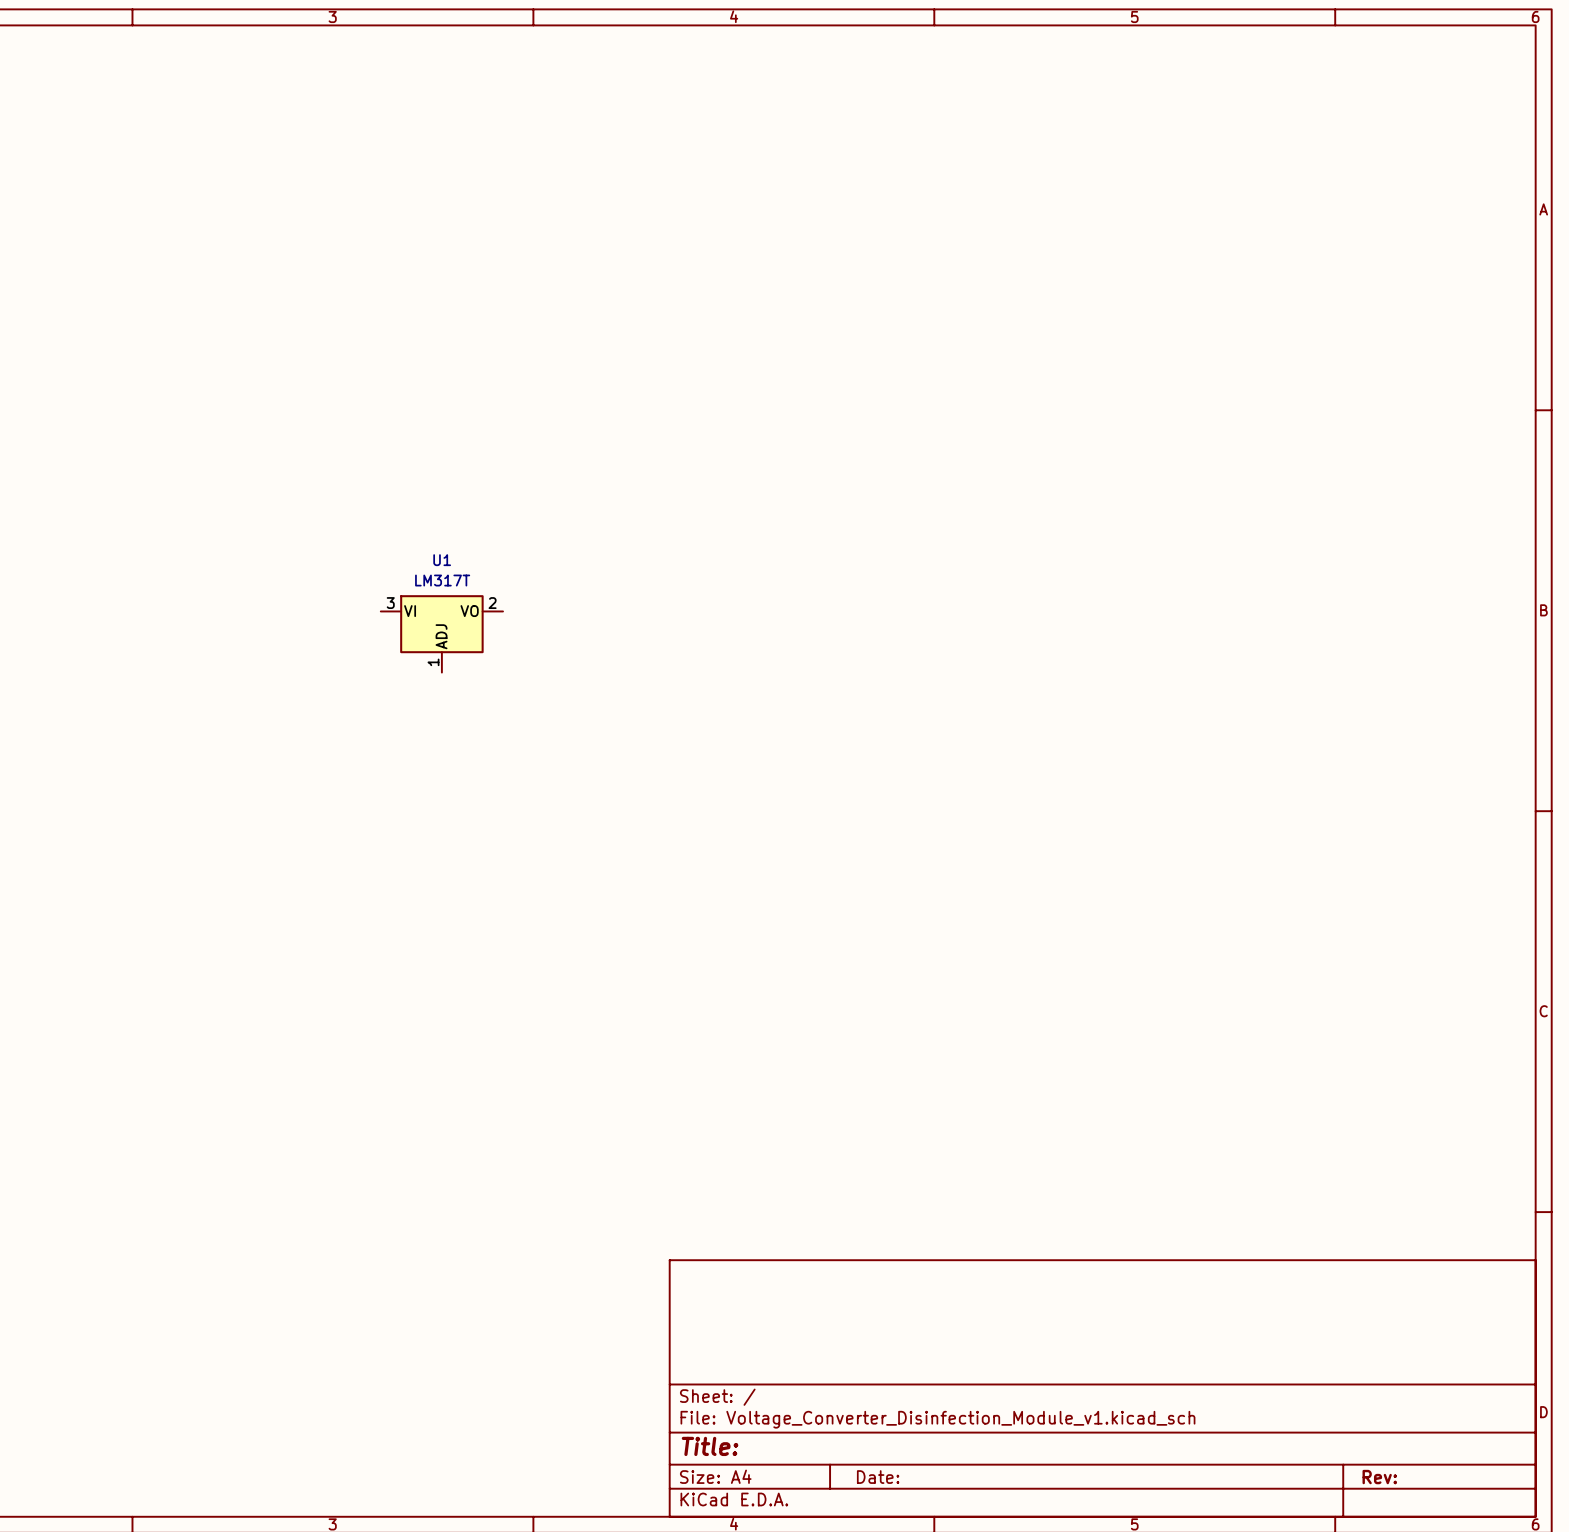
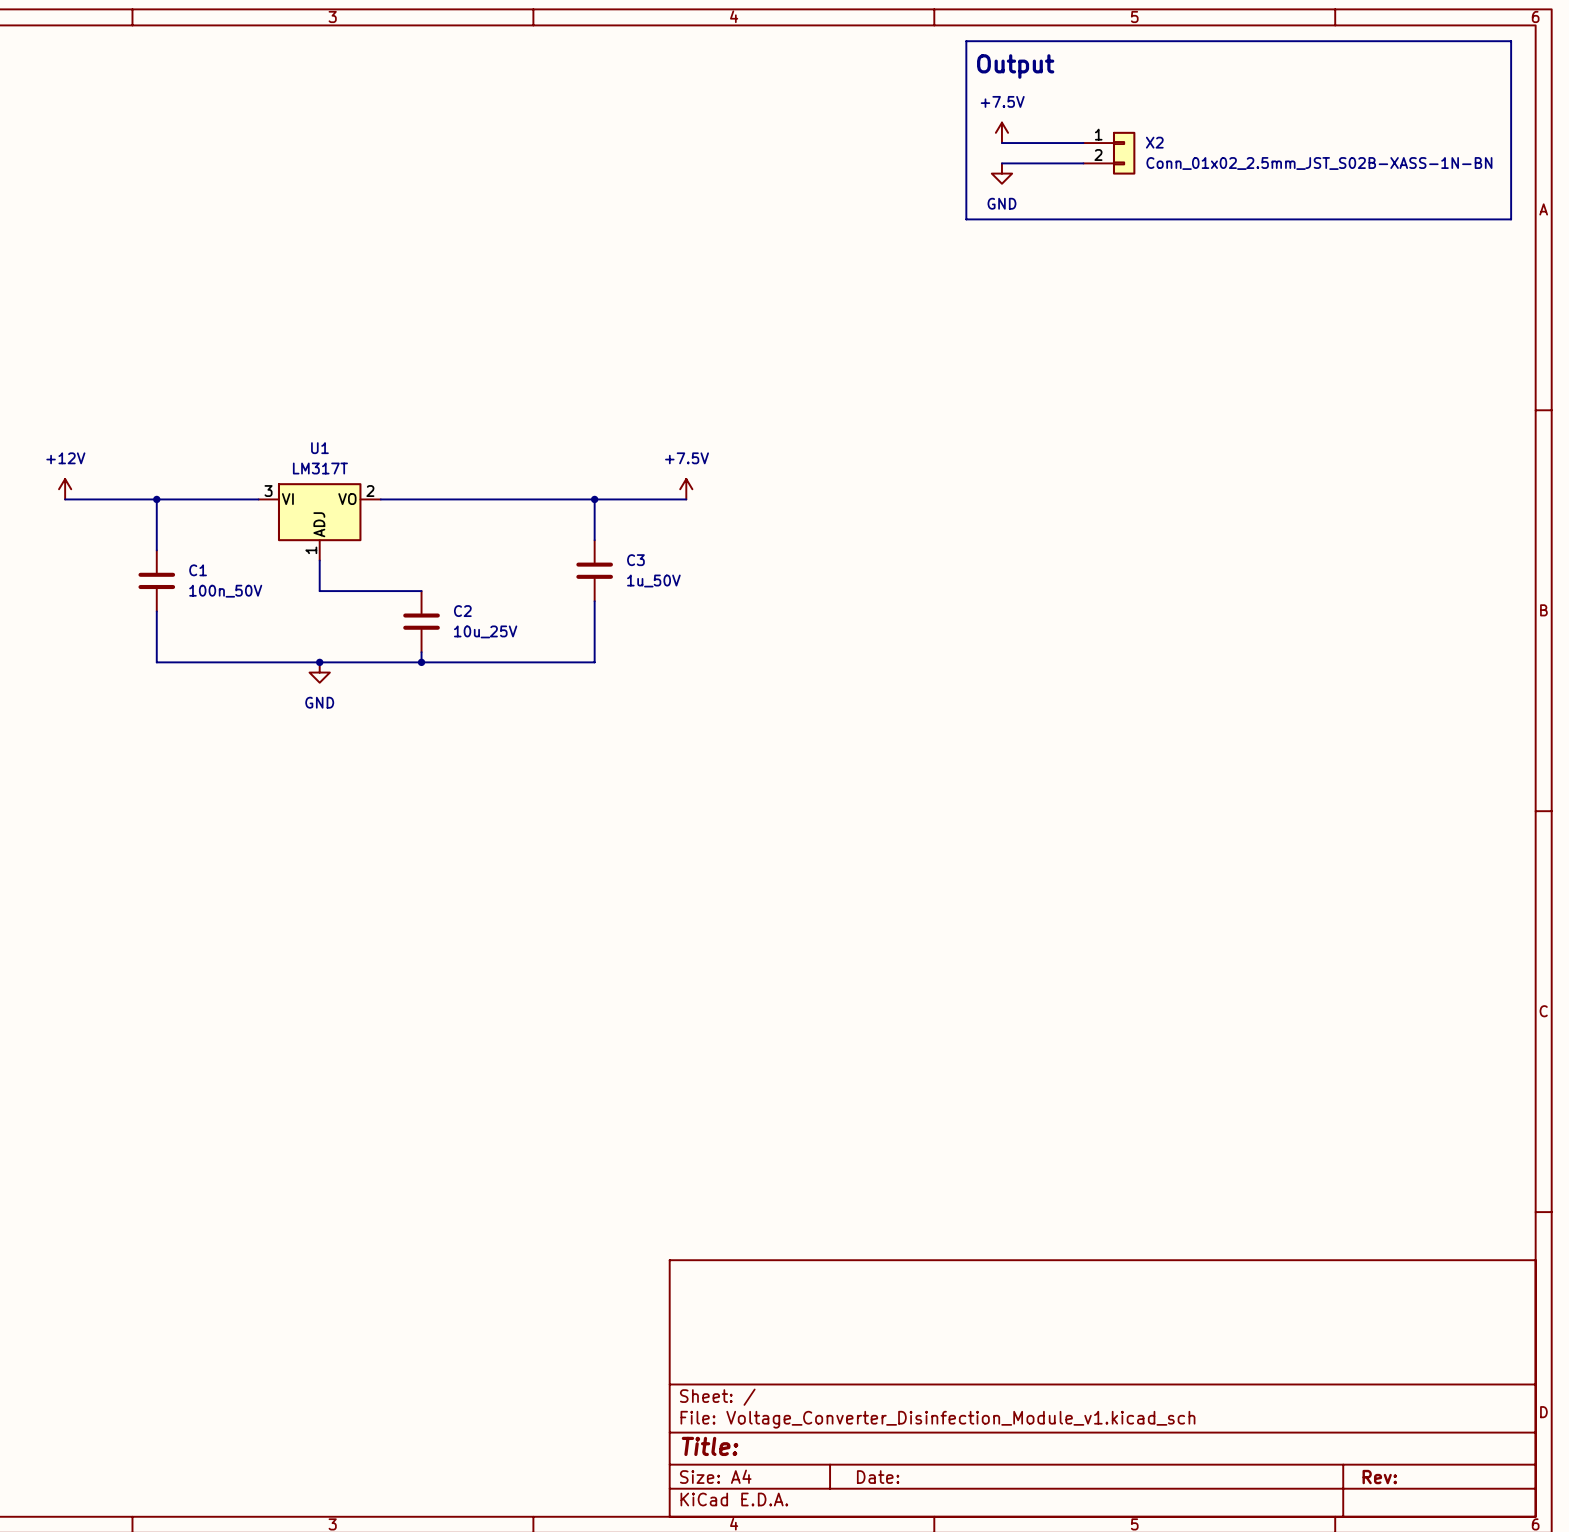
line: none -> (966, 41) (1511, 41) (1511, 219) (966, 219) (966, 41)
text: none -> Output (1015, 66)
power symbol: none -> +7.5V (1001, 132)
wire: none -> (1001, 143) (1083, 143)
X2: none -> Conn_01x02_2.5mm_JST_S02B-XASS-1N-BN (1109, 153)
wire: none -> (1001, 163) (1083, 163)
power symbol: none -> GND (1001, 173)
power symbol: none -> +12V (65, 489)
power symbol: none -> +7.5V (686, 489)
wire: none -> (65, 499) (258, 499)
wire: none -> (156, 499) (156, 550)
junction: none -> (156, 499)
wire: none -> (380, 499) (686, 499)
wire: none -> (594, 499) (594, 540)
junction: none -> (594, 499)
wire: none -> (319, 560) (319, 591) (421, 591)
C3: none -> 1u_50V (594, 570)
C1: none -> 100n_50V (156, 580)
wire: none -> (594, 601) (594, 662) (156, 662) (156, 611)
C2: none -> 10u_25V (421, 621)
U1 position: (441, 633) -> (319, 521)
wire: none -> (421, 652) (421, 662)
junction: none -> (319, 662)
junction: none -> (421, 662)
power symbol: none -> GND (319, 672)

